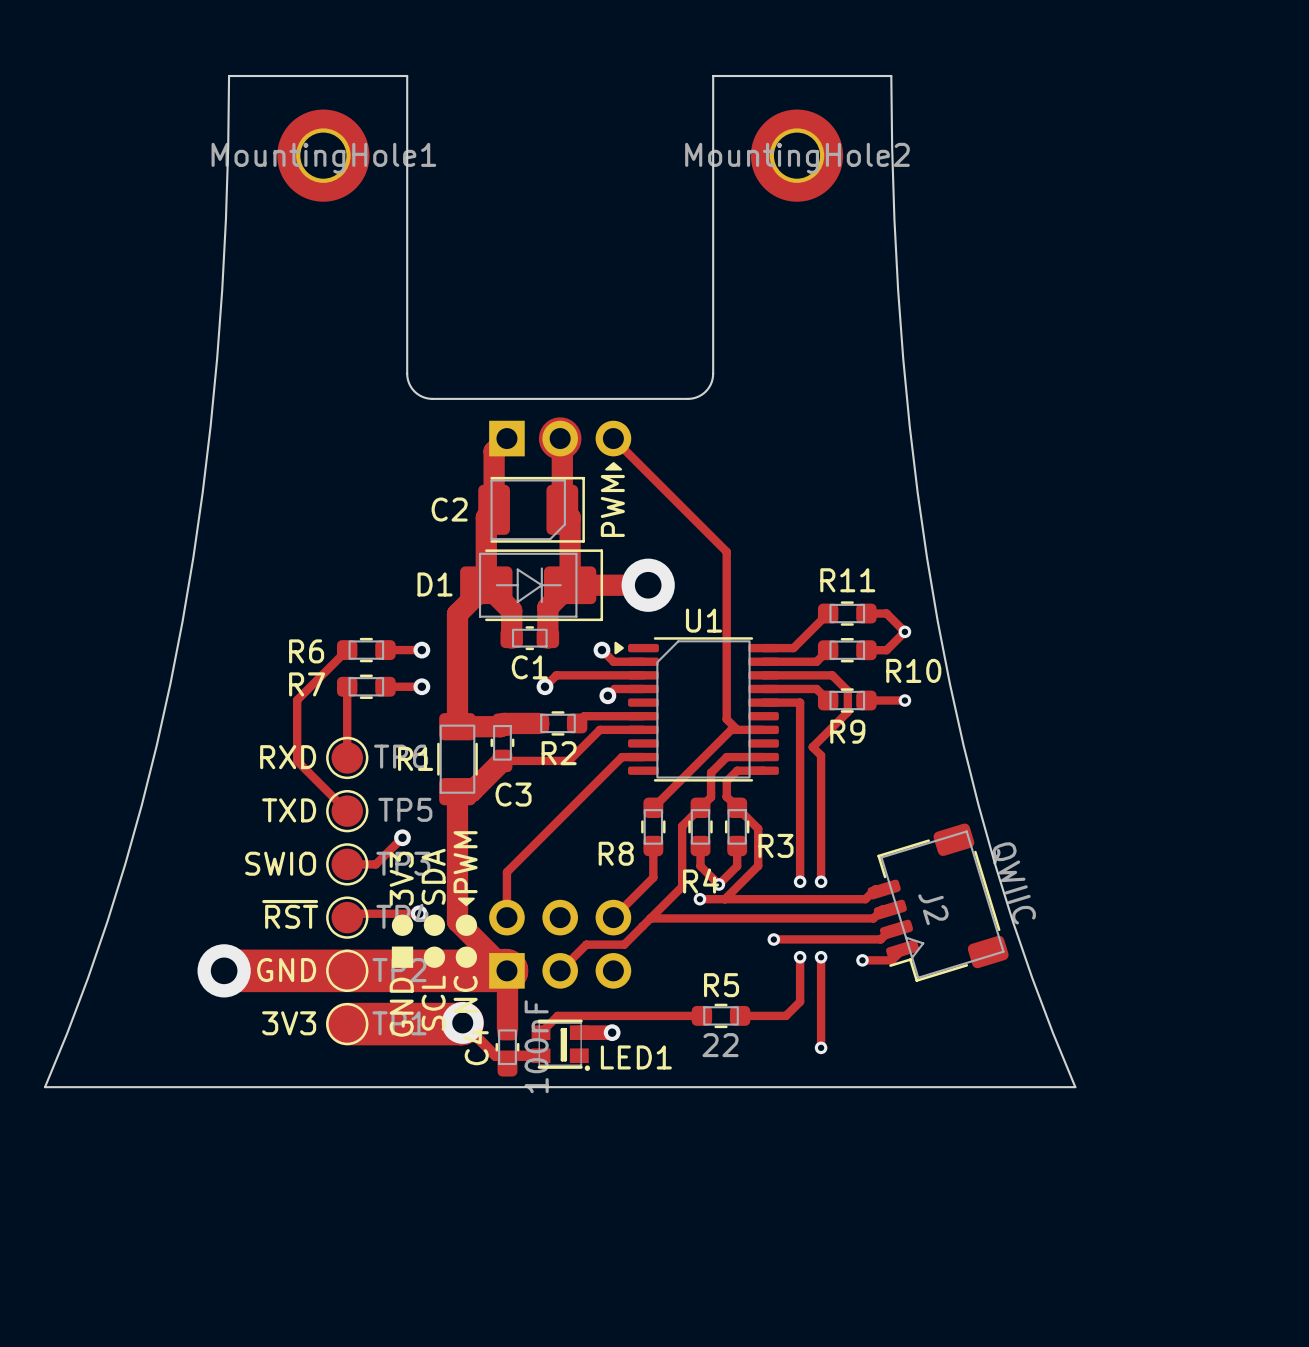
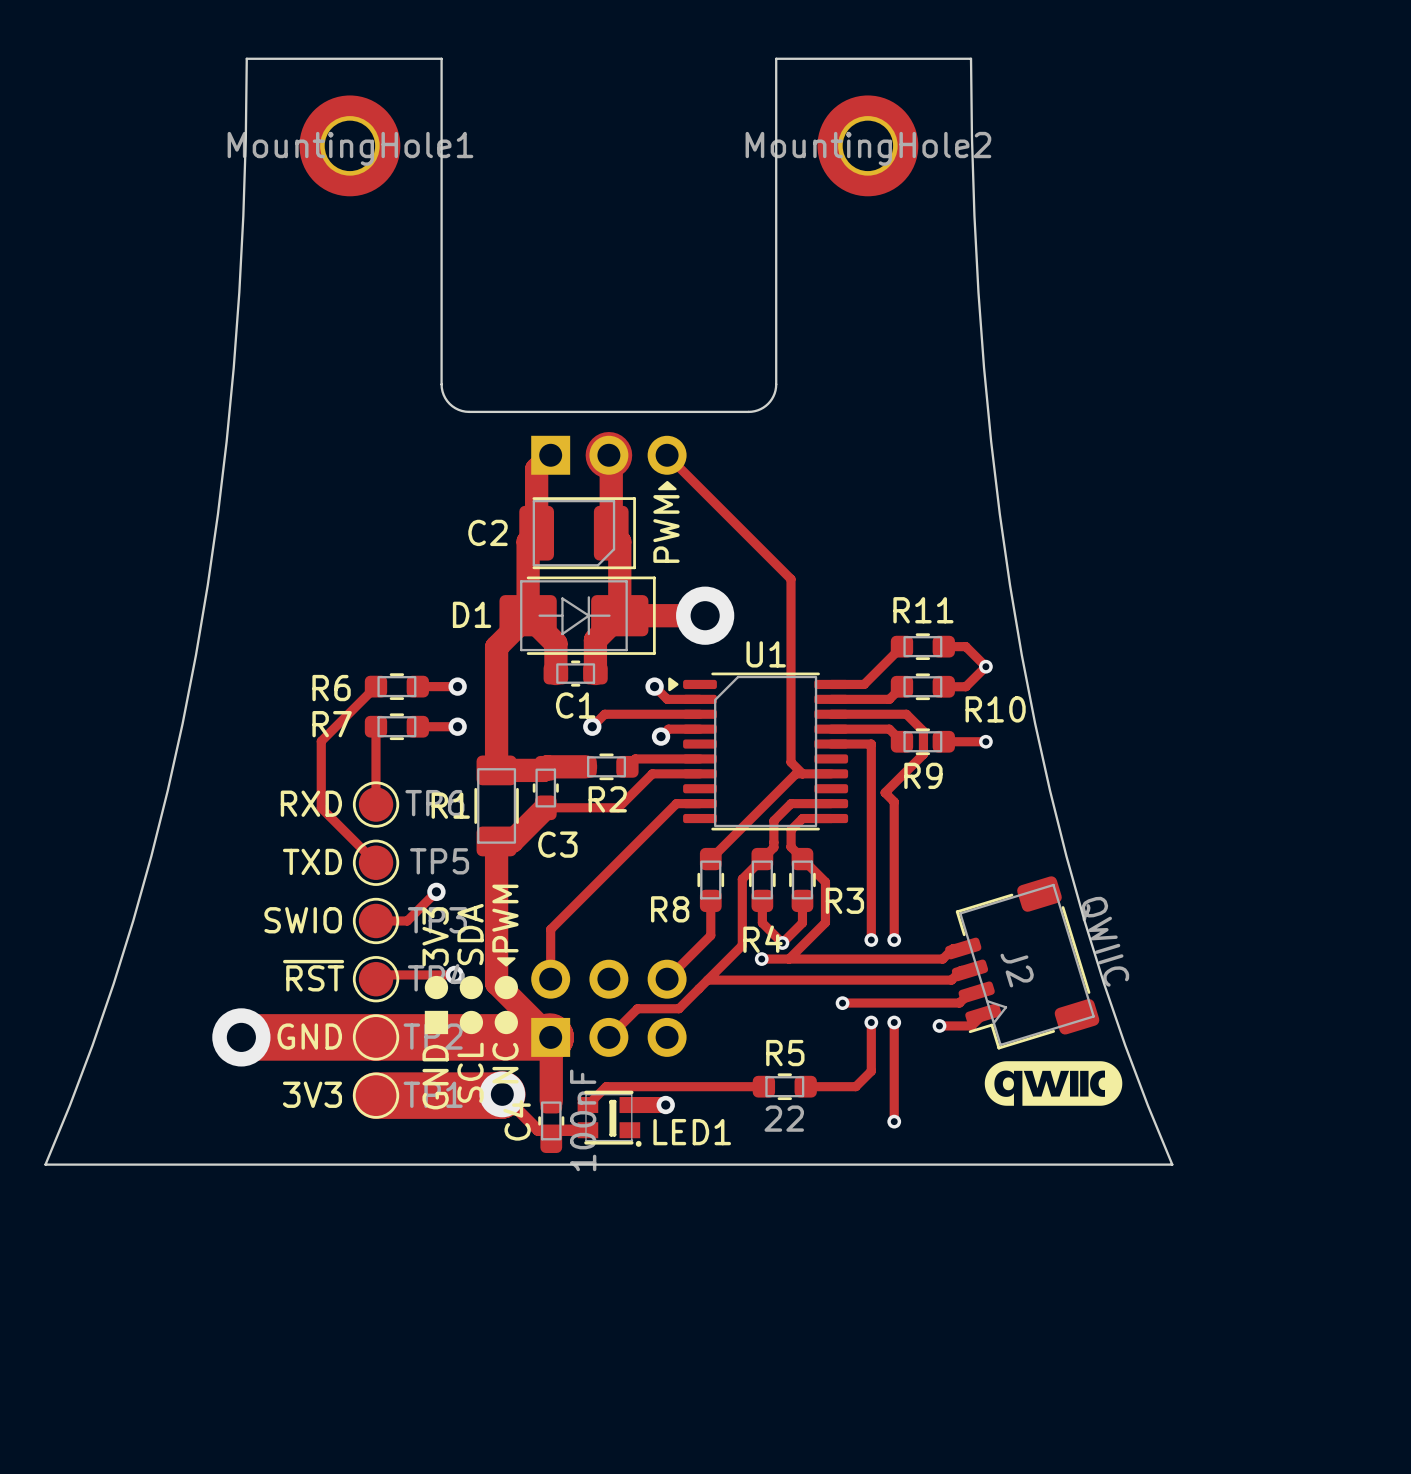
drawing: none -> [984, 1061, 1123, 1106]

